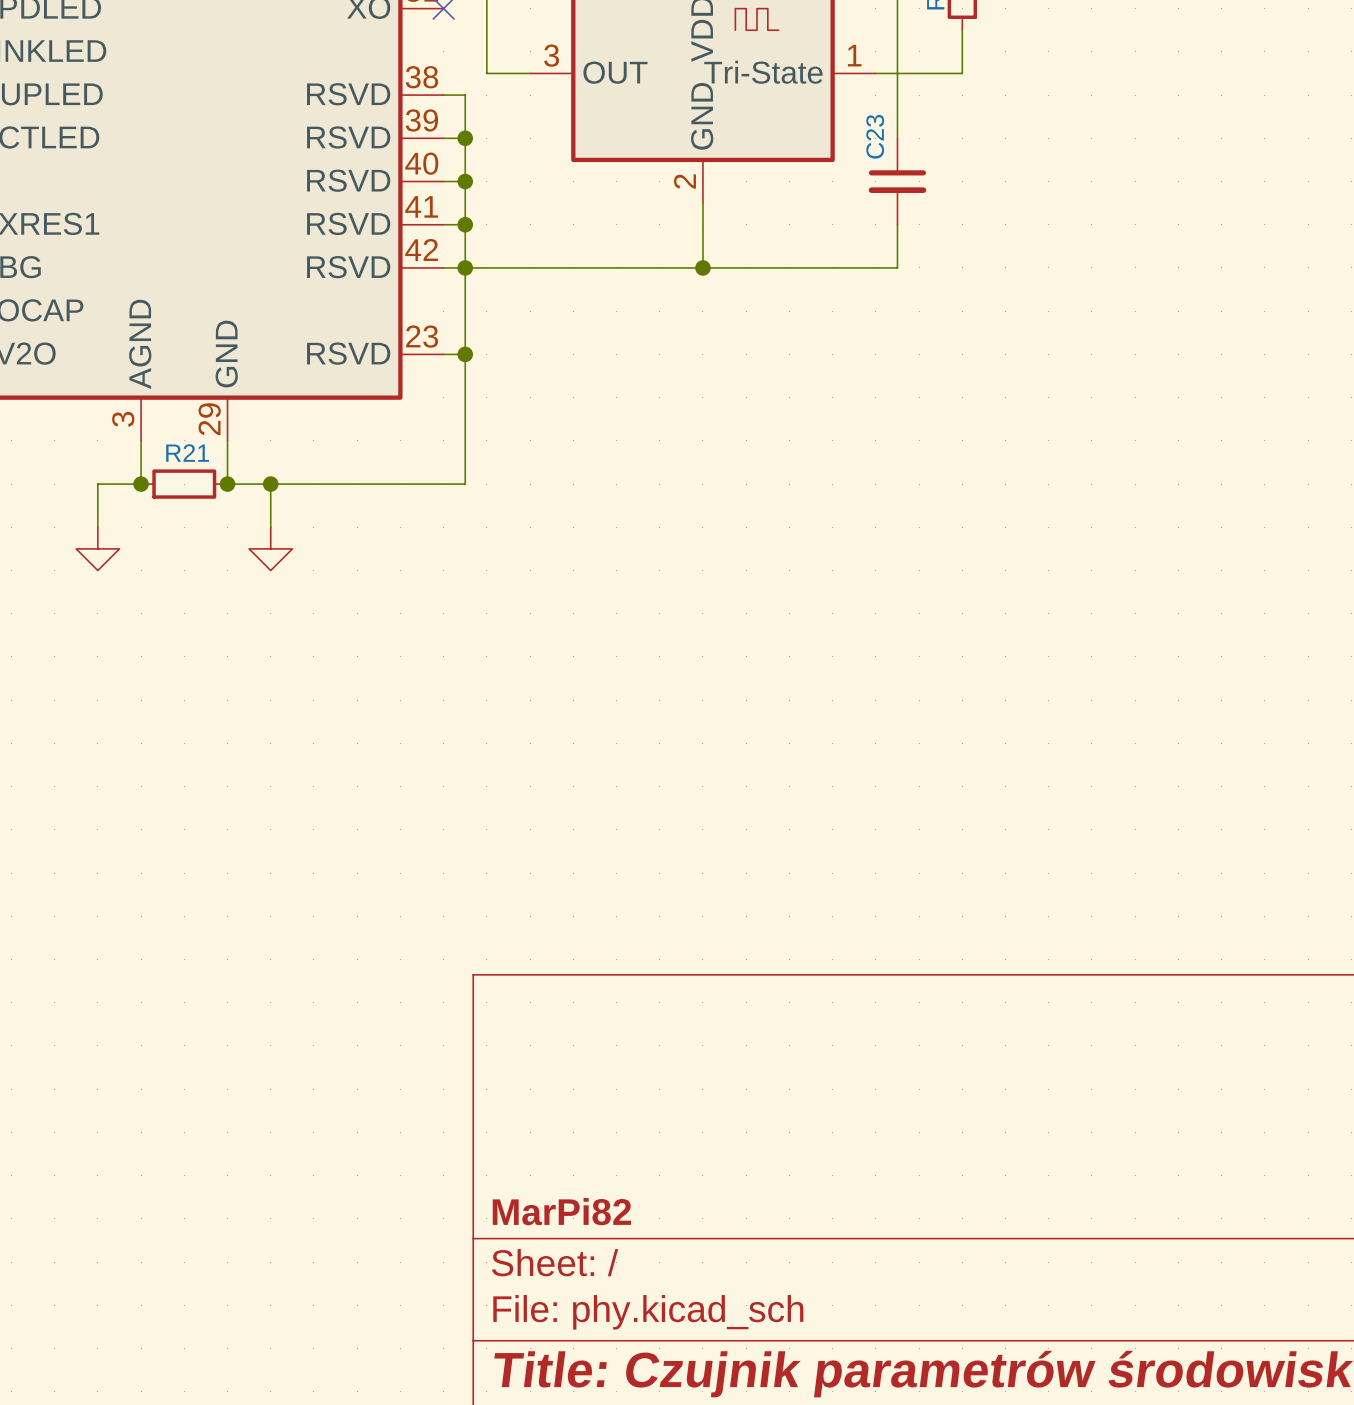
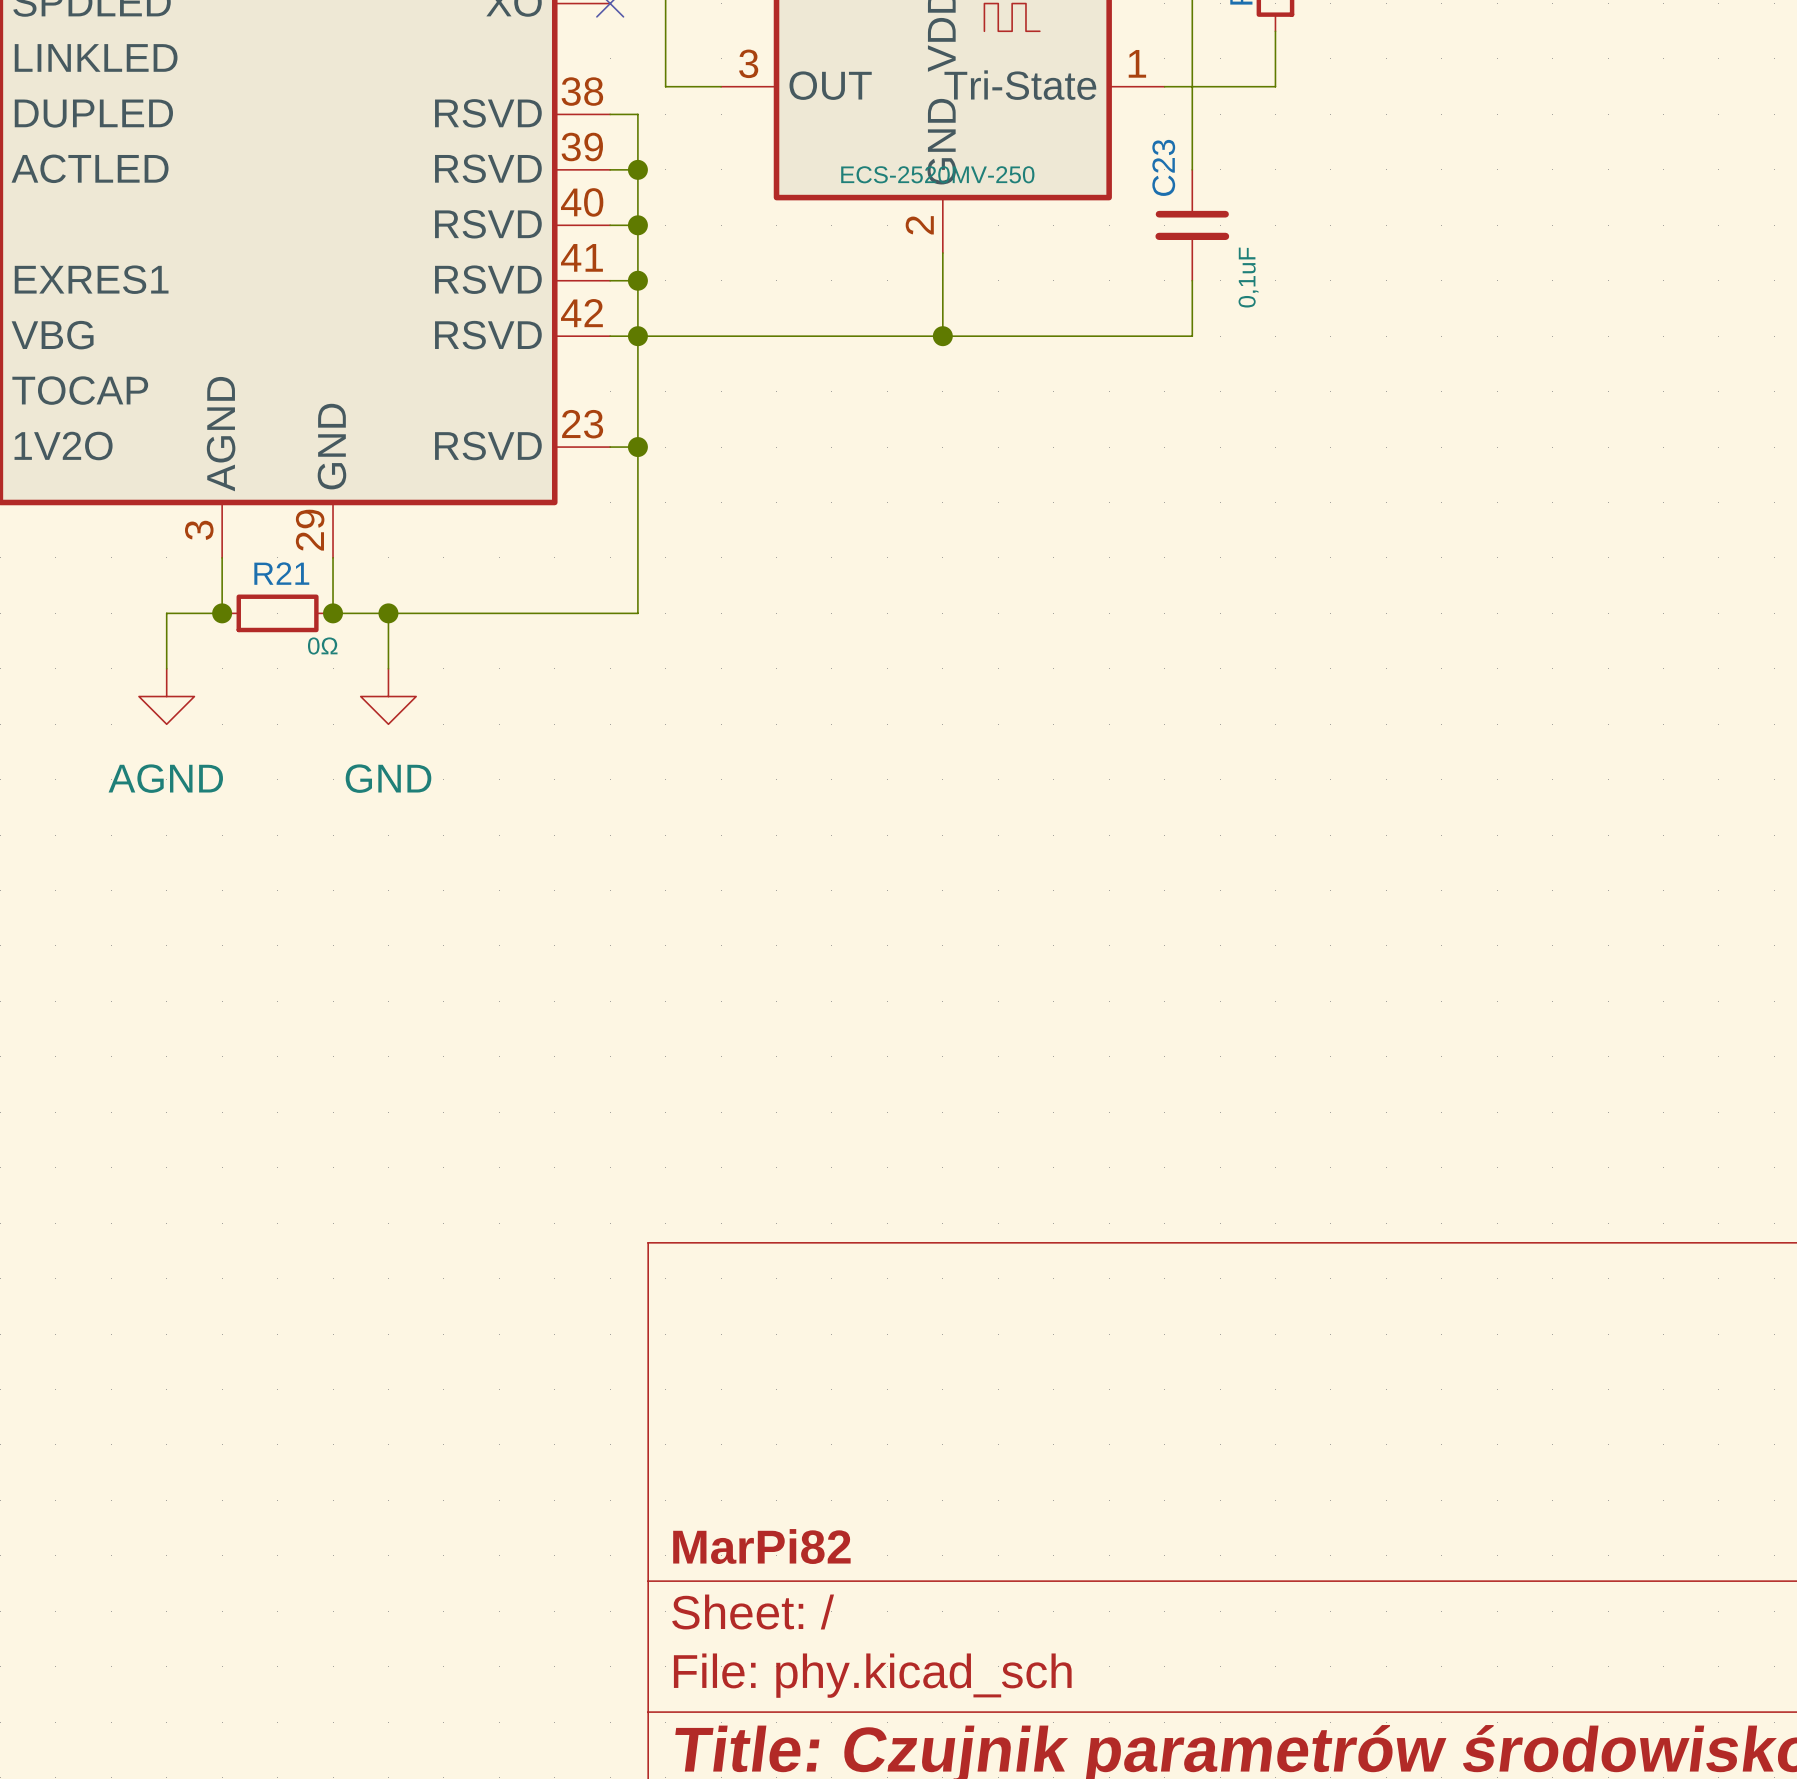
part value: none -> ECS-2520MV-250 (937, 174)
C23 value: none -> 0,1uF (1248, 277)
R21 value: none -> 0Ω (322, 646)
power symbol text: none -> AGND (165, 778)
power symbol text: none -> GND (388, 778)

